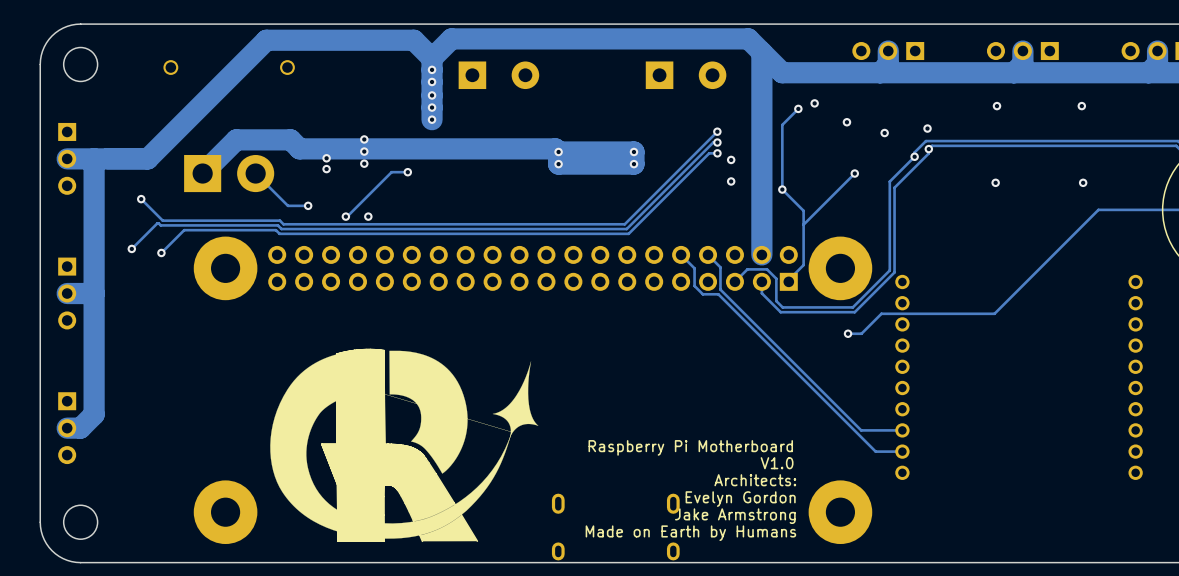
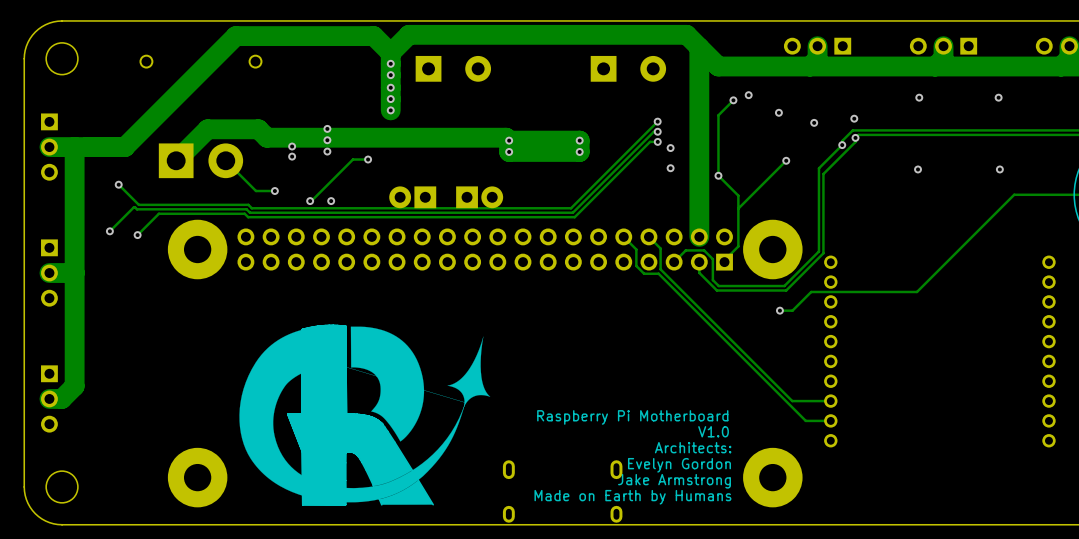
part: none -> (412, 197)
part: none -> (479, 197)

